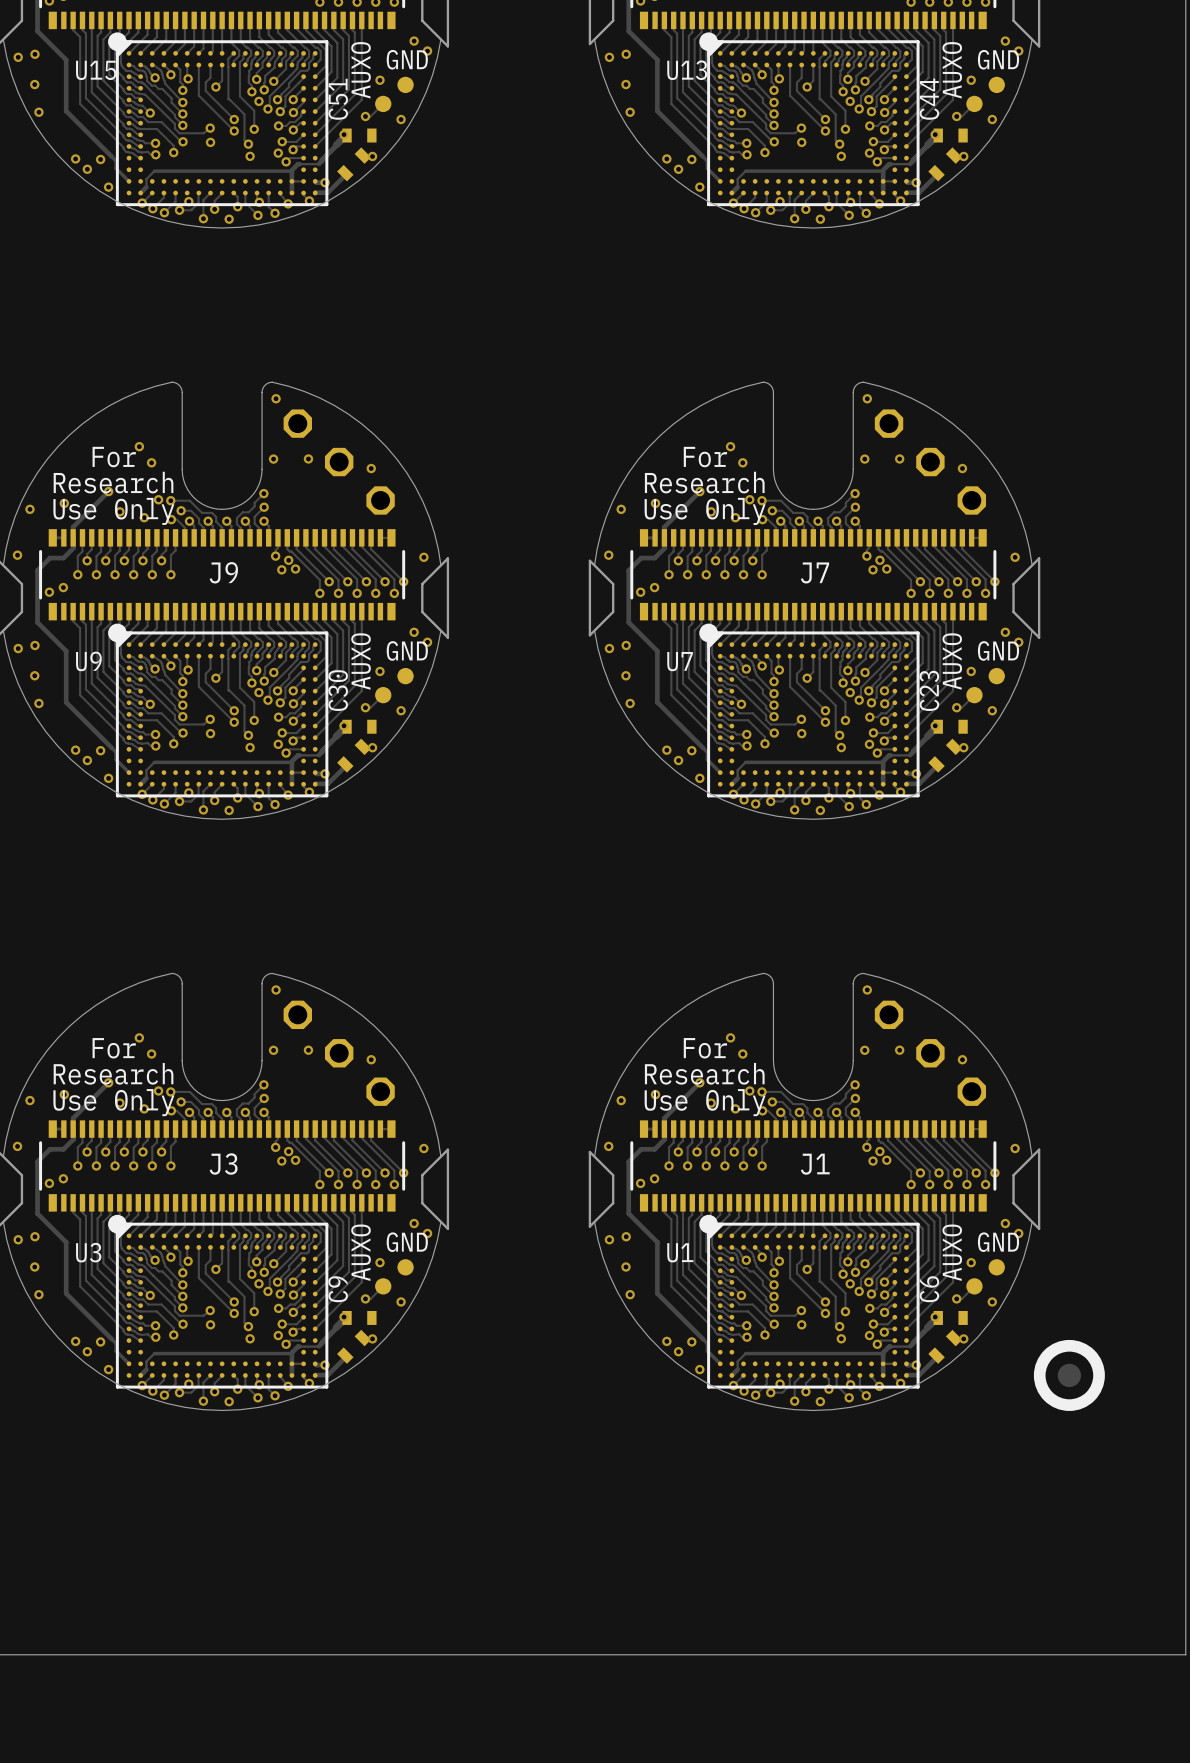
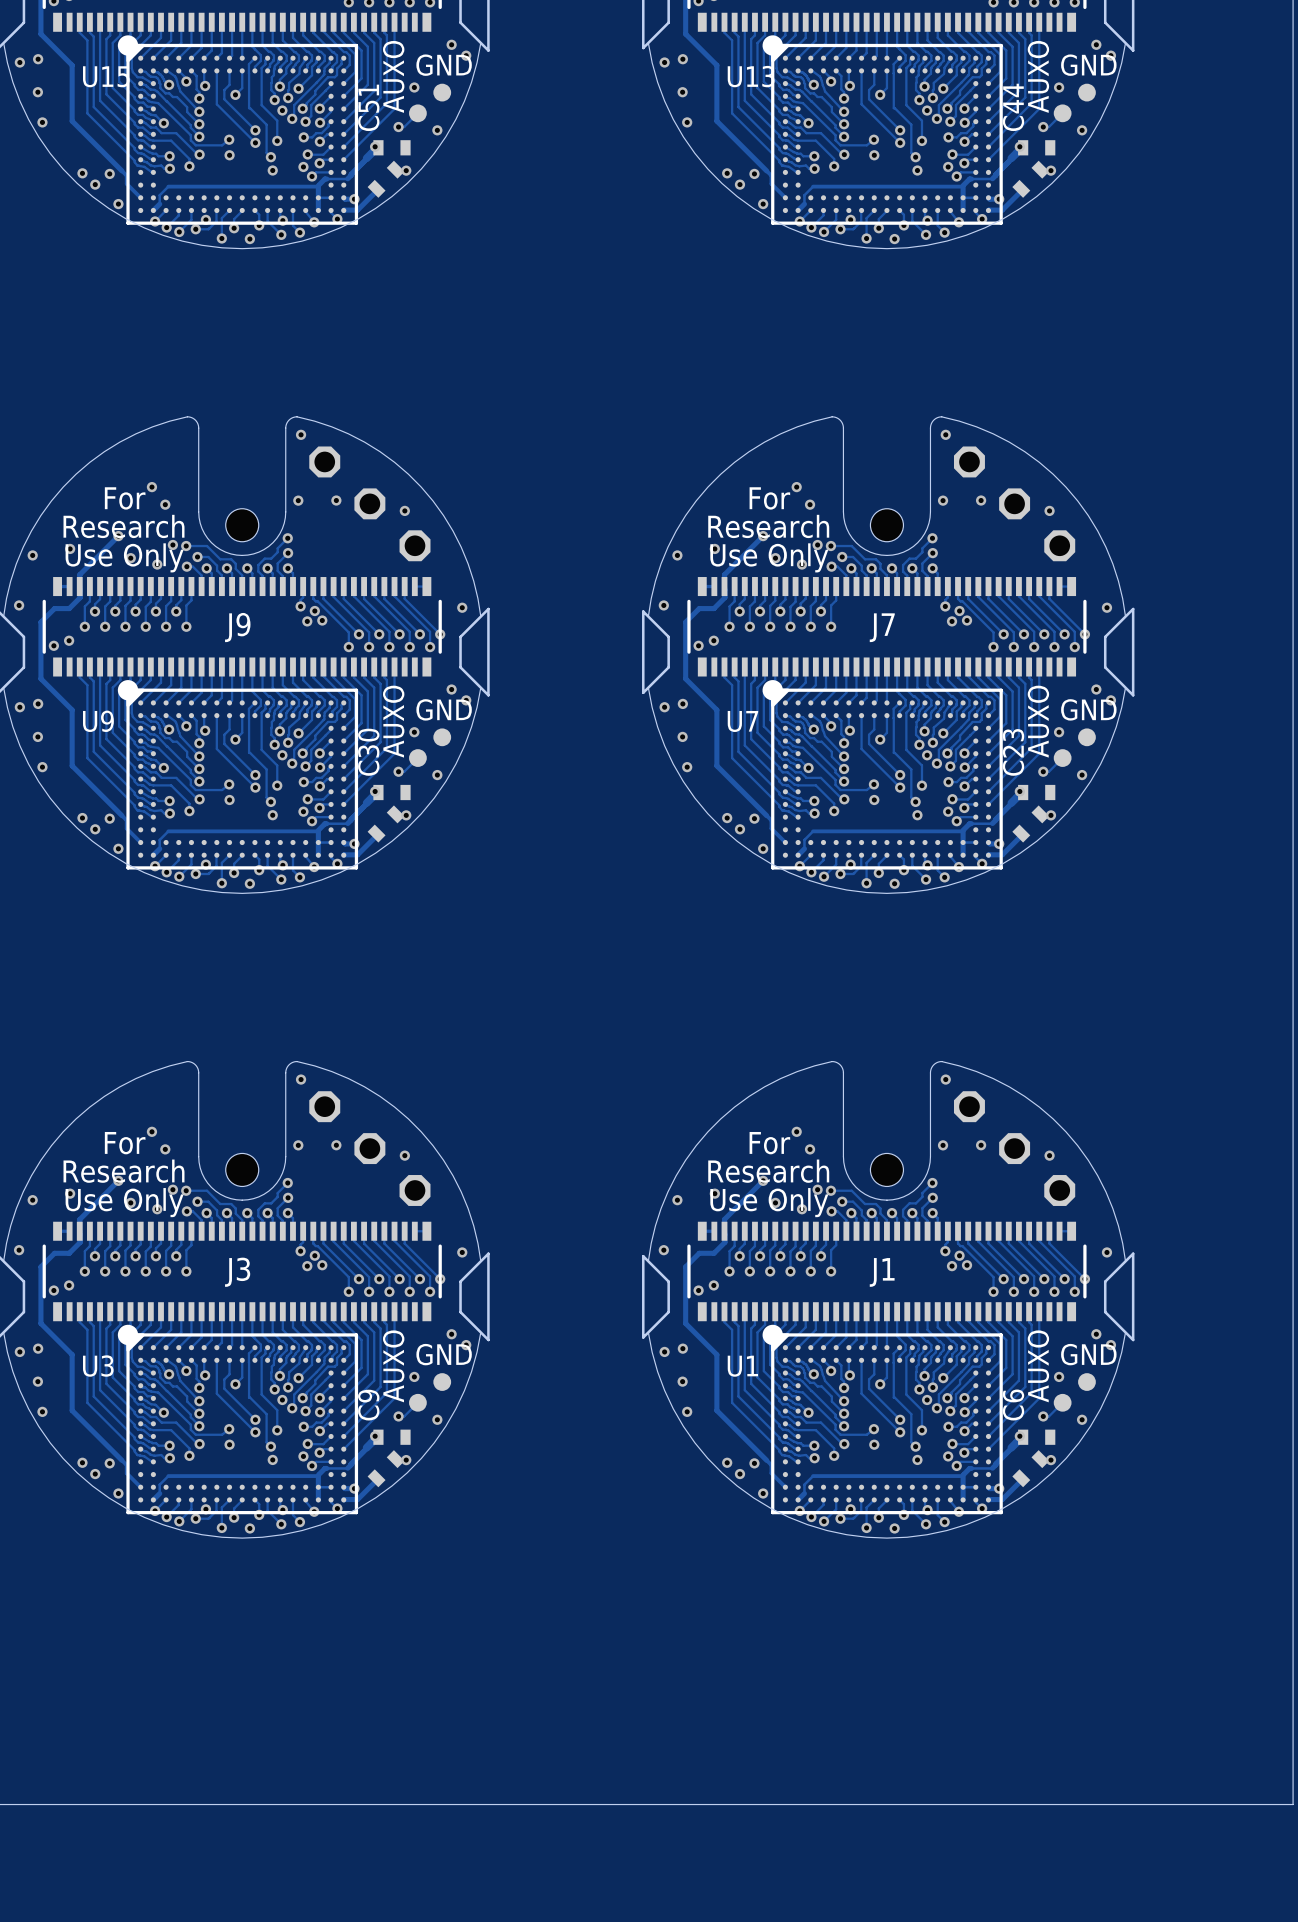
hole: none -> (242, 525)
hole: none -> (886, 525)
hole: none -> (242, 1169)
hole: none -> (886, 1169)
drawing: [1033, 1339, 1105, 1411] -> none

